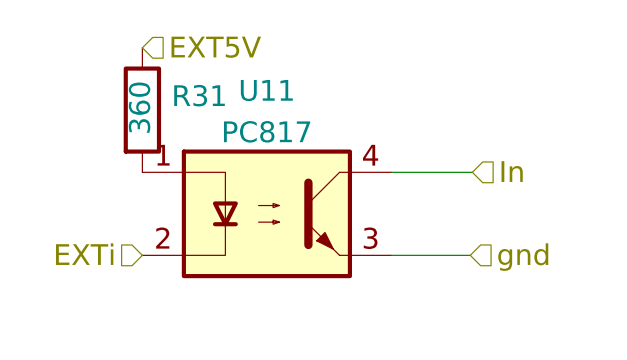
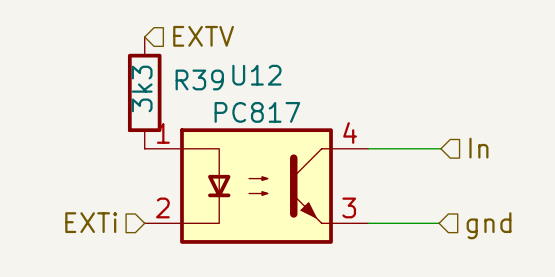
hierarchical label: EXT5V (216, 47) -> EXTV (203, 36)
U11 name: U11 (266, 90) -> U12 (256, 75)
R31 name: R31 (199, 95) -> R39 (199, 79)
R31 value: 360 (139, 107) -> 3k3 (142, 88)

